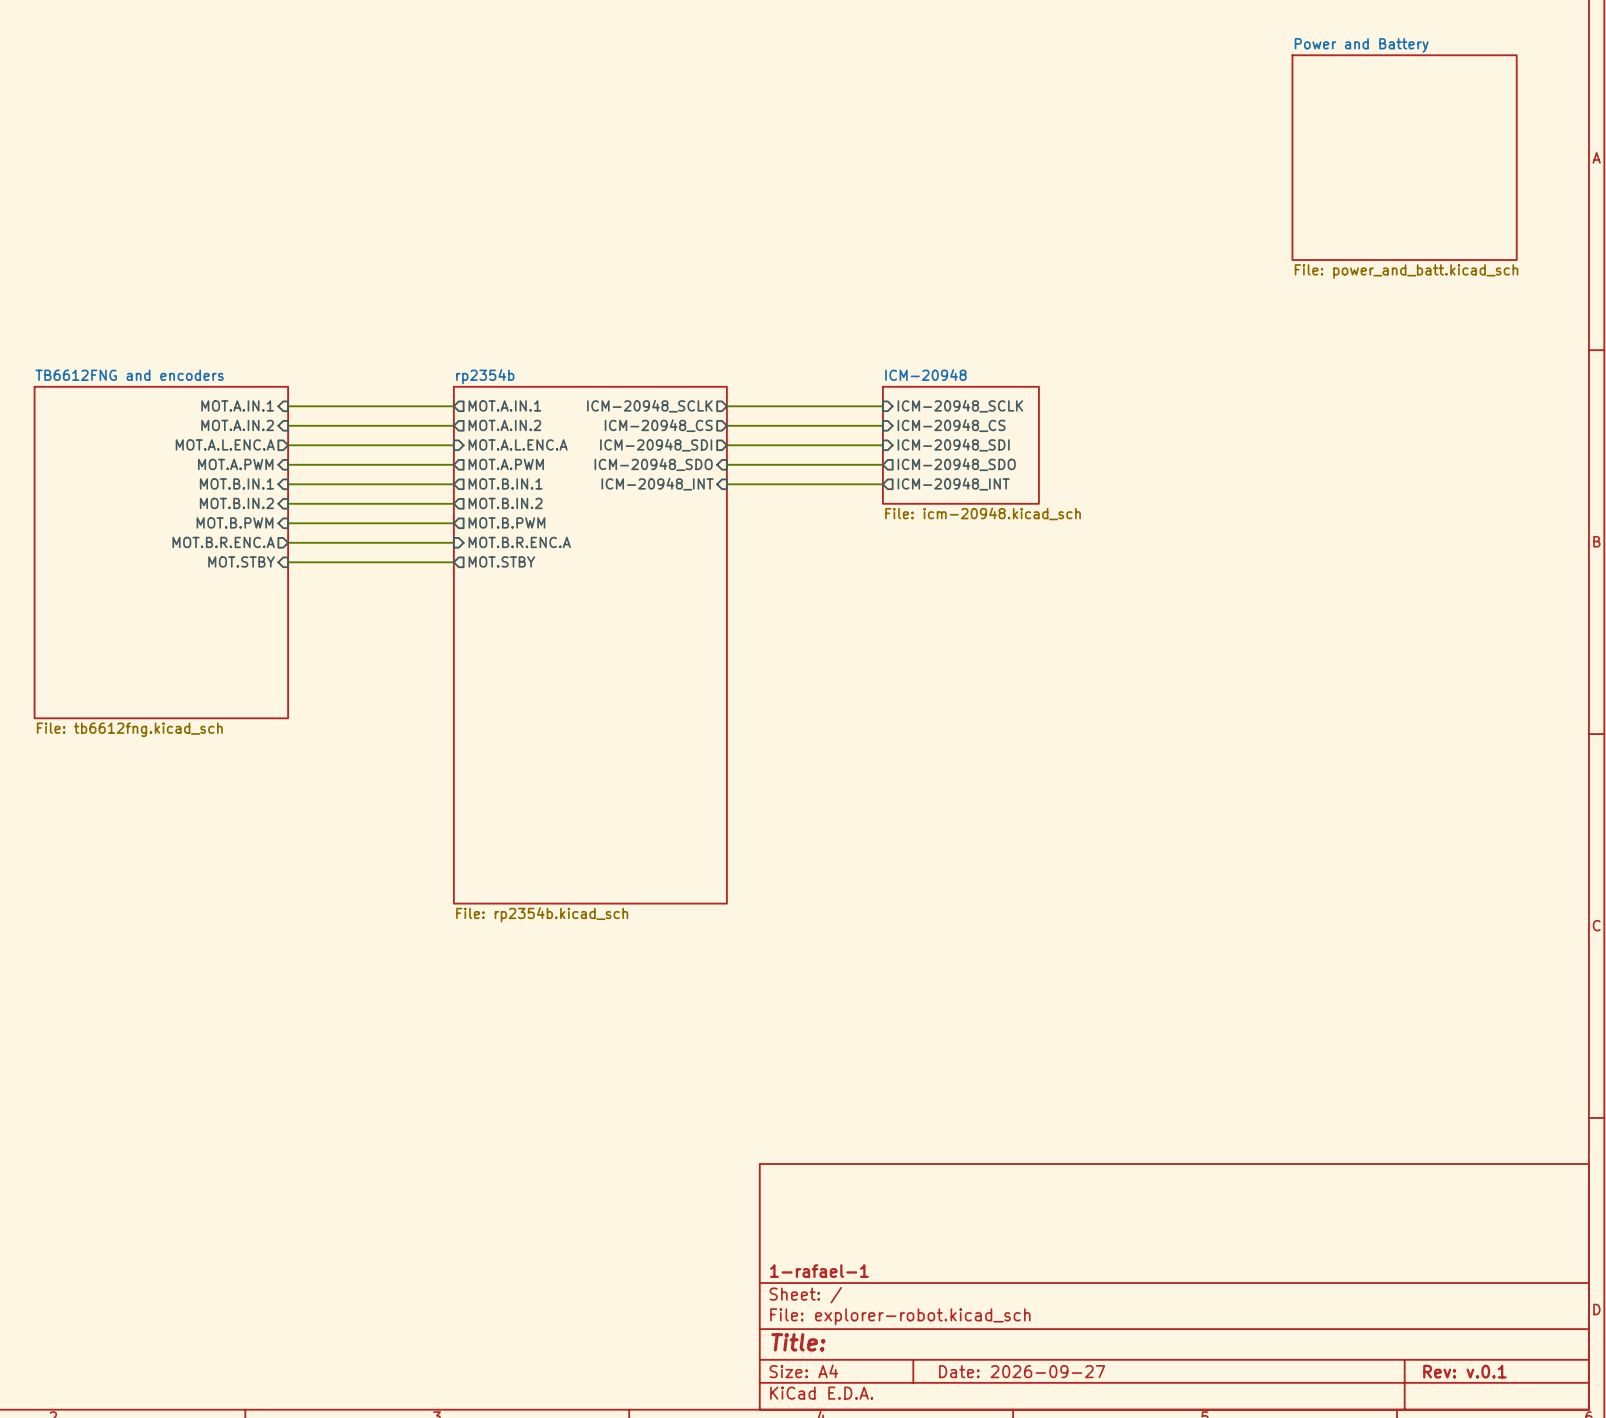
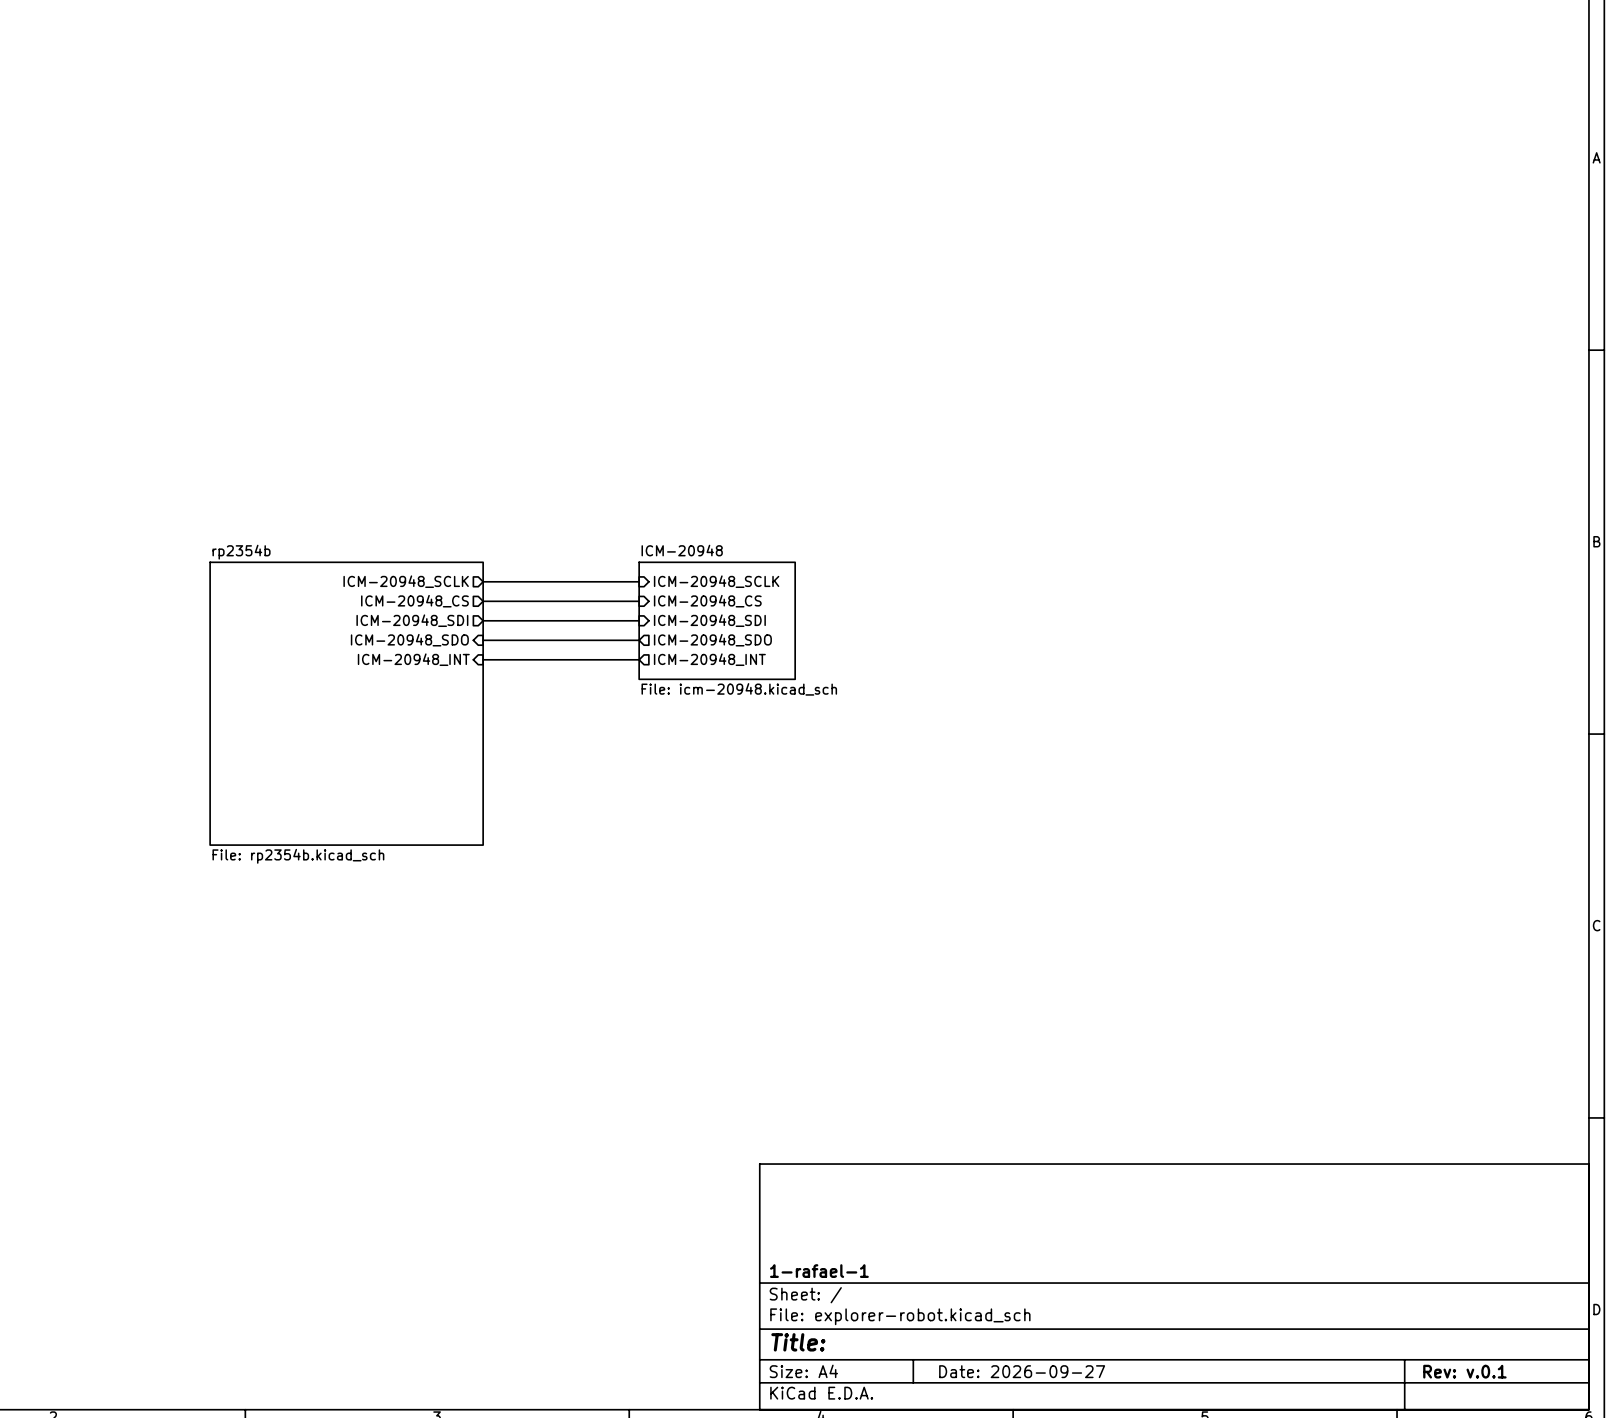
sheet Power and Battery: File: power_and_batt.kicad_sch (1404, 157) -> none
sheet rp2354b name position: rp2354b (485, 376) -> rp2354b (241, 552)
sheet rp2354b shape: [453, 386, 728, 905] -> [209, 561, 484, 846]
sheet pin: MOT.A.IN.1 (237, 405) -> none
sheet pin: MOT.A.IN.1 (504, 405) -> none
wire: (288, 406) (453, 406) -> none
sheet pin: ICM-20948_SCLK (649, 406) -> none
wire: (726, 406) (882, 406) -> none
sheet pin: ICM-20948_SCLK (960, 406) -> none
sheet pin: MOT.A.IN.2 (237, 425) -> none
wire: (288, 425) (453, 425) -> none
sheet pin: MOT.A.IN.2 (504, 425) -> none
sheet pin: ICM-20948_CS (658, 425) -> none
wire: (726, 425) (882, 425) -> none
sheet pin: ICM-20948_CS (951, 425) -> none
sheet pin: MOT.A.L.ENC.A (225, 444) -> none
sheet pin: MOT.A.L.ENC.A (518, 444) -> none
wire: (288, 445) (453, 445) -> none
sheet pin: ICM-20948_SDI (656, 445) -> none
wire: (726, 445) (882, 445) -> none
sheet pin: ICM-20948_SDI (953, 445) -> none
sheet ICM-20948 position: (960, 445) -> (717, 620)
sheet pin: MOT.A.PWM (235, 464) -> none
wire: (288, 464) (453, 464) -> none
sheet pin: MOT.A.PWM (506, 464) -> none
sheet pin: ICM-20948_SDO (653, 464) -> none
wire: (726, 464) (882, 464) -> none
sheet pin: ICM-20948_SDO (956, 464) -> none
sheet pin: MOT.B.IN.1 (236, 483) -> none
sheet pin: MOT.B.IN.1 (505, 483) -> none
wire: (288, 484) (453, 484) -> none
sheet pin: ICM-20948_INT (657, 484) -> none
wire: (726, 484) (882, 484) -> none
sheet pin: ICM-20948_INT (953, 484) -> none
sheet pin: MOT.B.IN.2 (236, 503) -> none
wire: (288, 503) (453, 503) -> none
sheet pin: MOT.B.IN.2 (505, 503) -> none
sheet pin: MOT.B.PWM (235, 522) -> none
sheet pin: MOT.B.PWM (506, 522) -> none
wire: (288, 523) (453, 523) -> none
sheet pin: MOT.B.R.ENC.A (223, 542) -> none
wire: (288, 542) (453, 542) -> none
sheet pin: MOT.B.R.ENC.A (519, 542) -> none
sheet TB6612FNG and encoders: File: tb6612fng.kicad_sch (161, 552) -> none
sheet pin: MOT.STBY (241, 561) -> none
sheet pin: MOT.STBY (501, 561) -> none
sheet pin: none -> ICM-20948_SCLK (406, 581)
wire: none -> (483, 581) (639, 581)
sheet pin: none -> ICM-20948_SCLK (716, 581)
sheet pin: none -> ICM-20948_CS (414, 601)
wire: none -> (483, 601) (639, 601)
sheet pin: none -> ICM-20948_CS (707, 601)
sheet pin: none -> ICM-20948_SDI (412, 620)
wire: none -> (483, 620) (639, 620)
sheet pin: none -> ICM-20948_SDI (709, 620)
sheet pin: none -> ICM-20948_SDO (409, 640)
wire: none -> (483, 640) (639, 640)
sheet pin: none -> ICM-20948_SDO (712, 640)
sheet pin: none -> ICM-20948_INT (413, 659)
wire: none -> (483, 659) (639, 659)
sheet pin: none -> ICM-20948_INT (709, 659)
sheet rp2354b value position: File: rp2354b.kicad_sch (542, 914) -> File: rp2354b.kicad_sch (298, 856)

